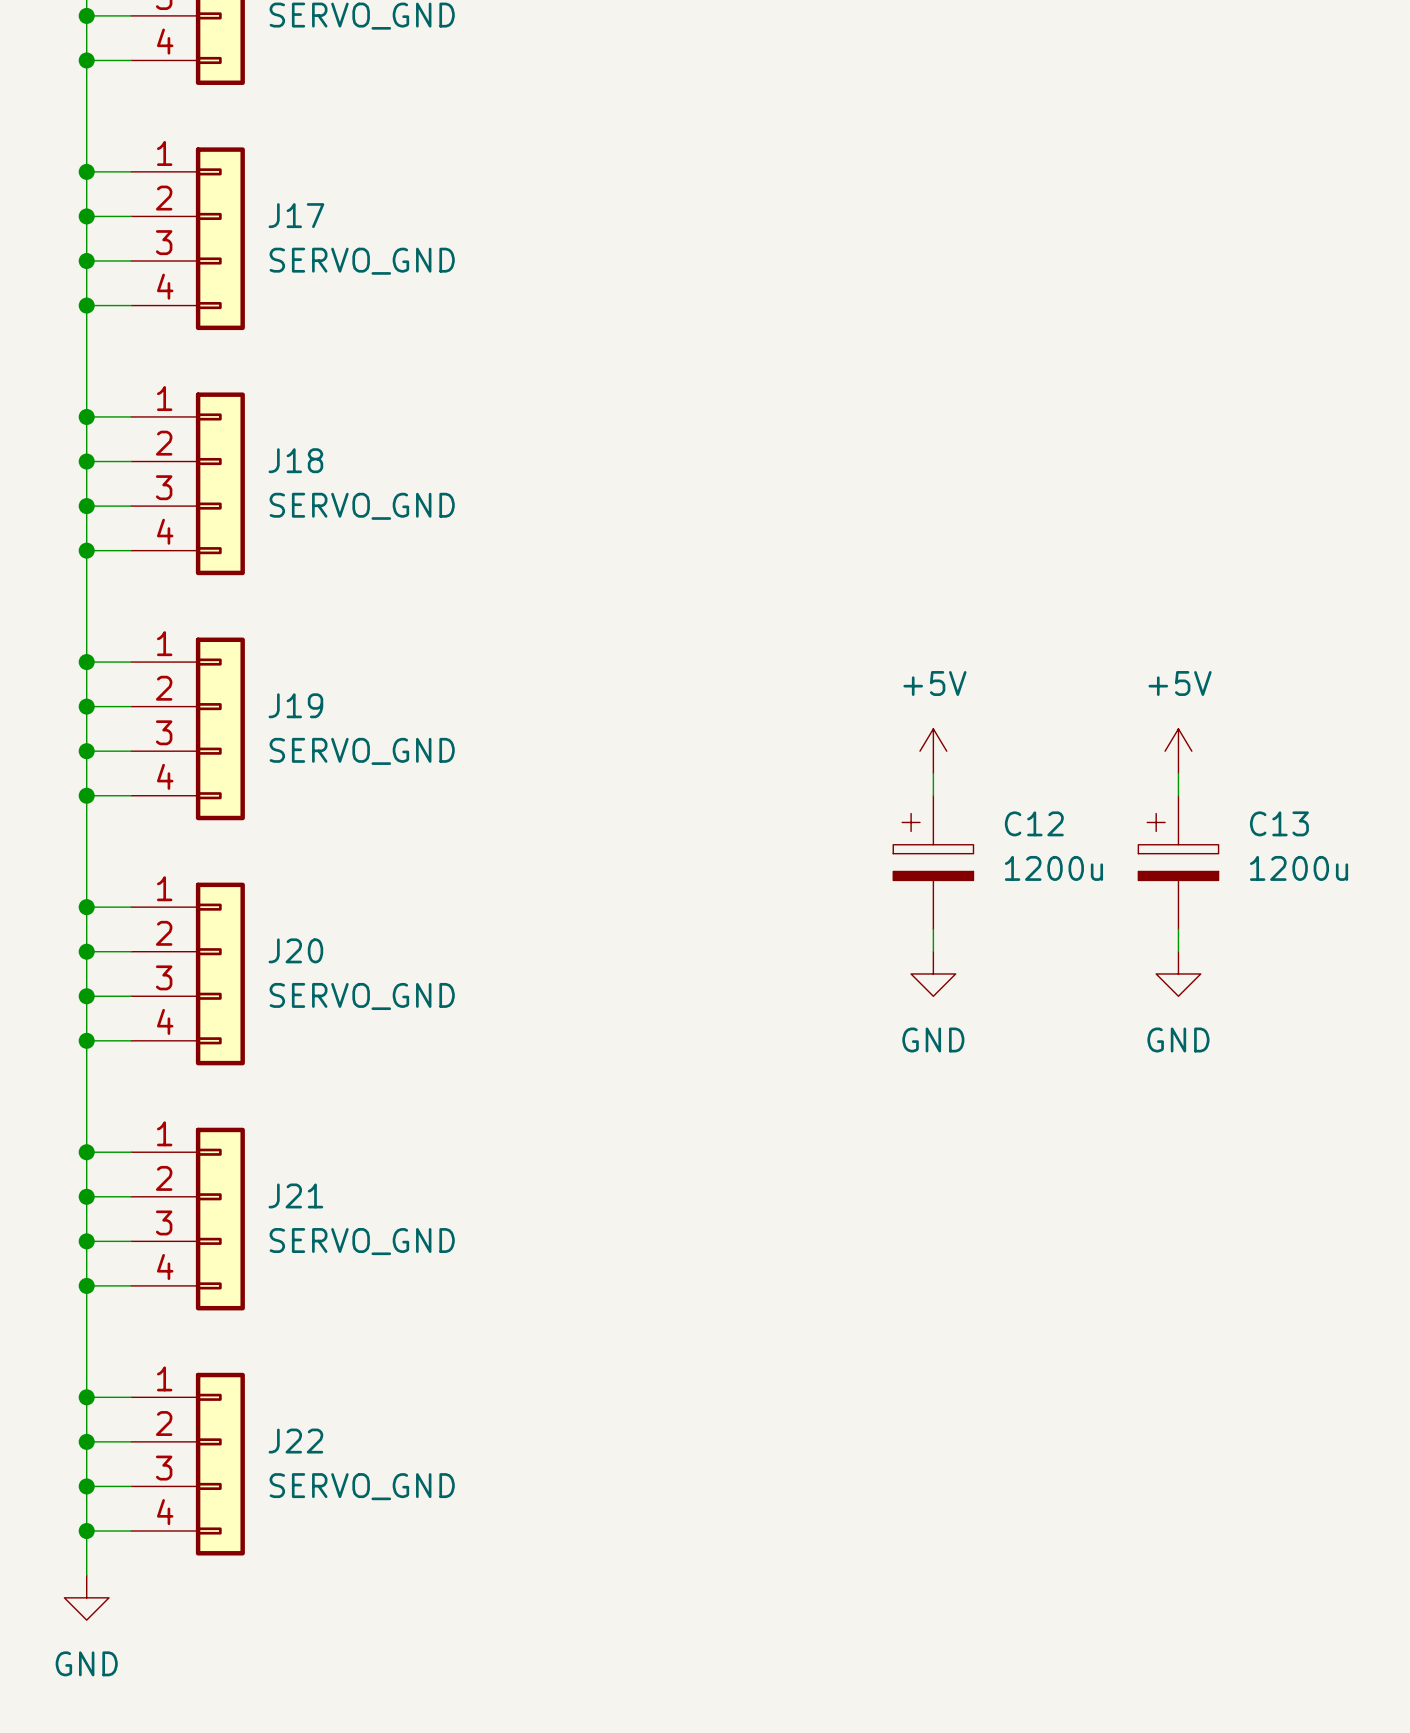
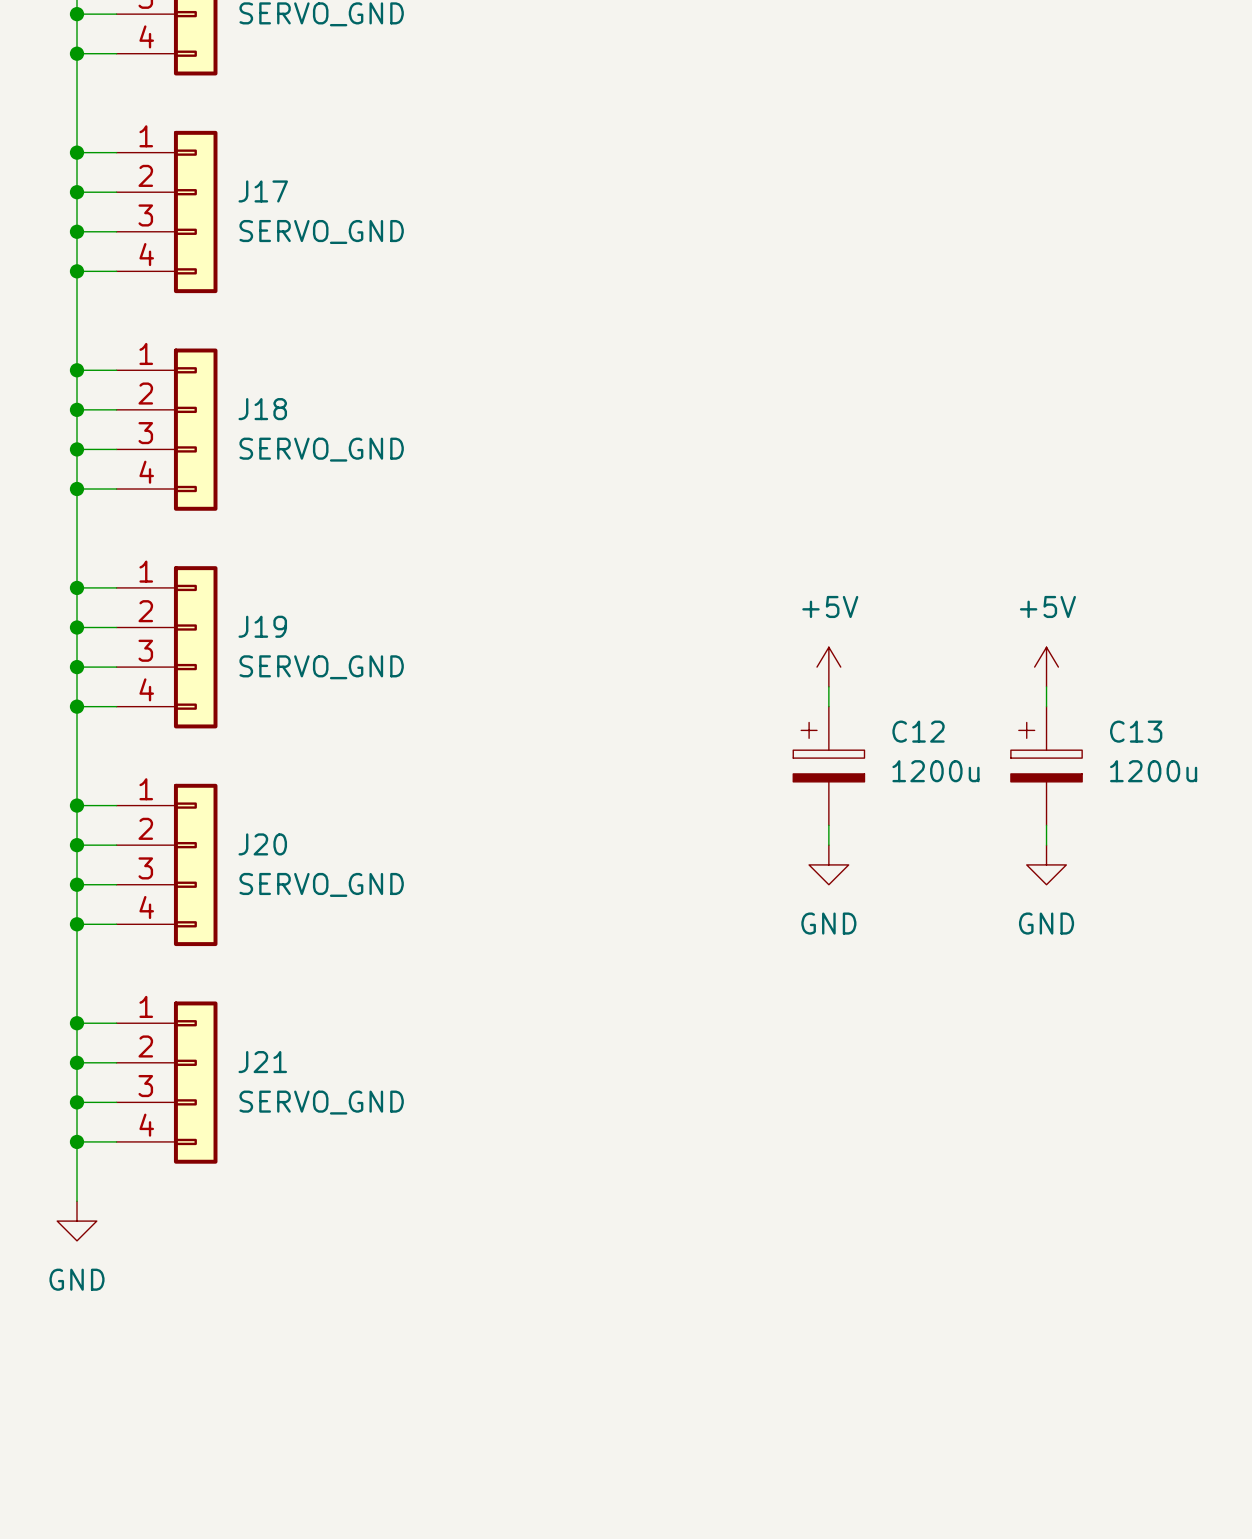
wire: (86, 1352) (86, 1575) -> none
wire: (86, 1397) (131, 1397) -> none
junction: (86, 1397) -> none
wire: (86, 1441) (131, 1441) -> none
junction: (86, 1441) -> none
J22: SERVO_GND (188, 1464) -> none
wire: (86, 1486) (131, 1486) -> none
junction: (86, 1486) -> none
wire: (86, 1531) (131, 1531) -> none
junction: (86, 1531) -> none
power symbol position: GND (86, 1597) -> GND (76, 1221)

